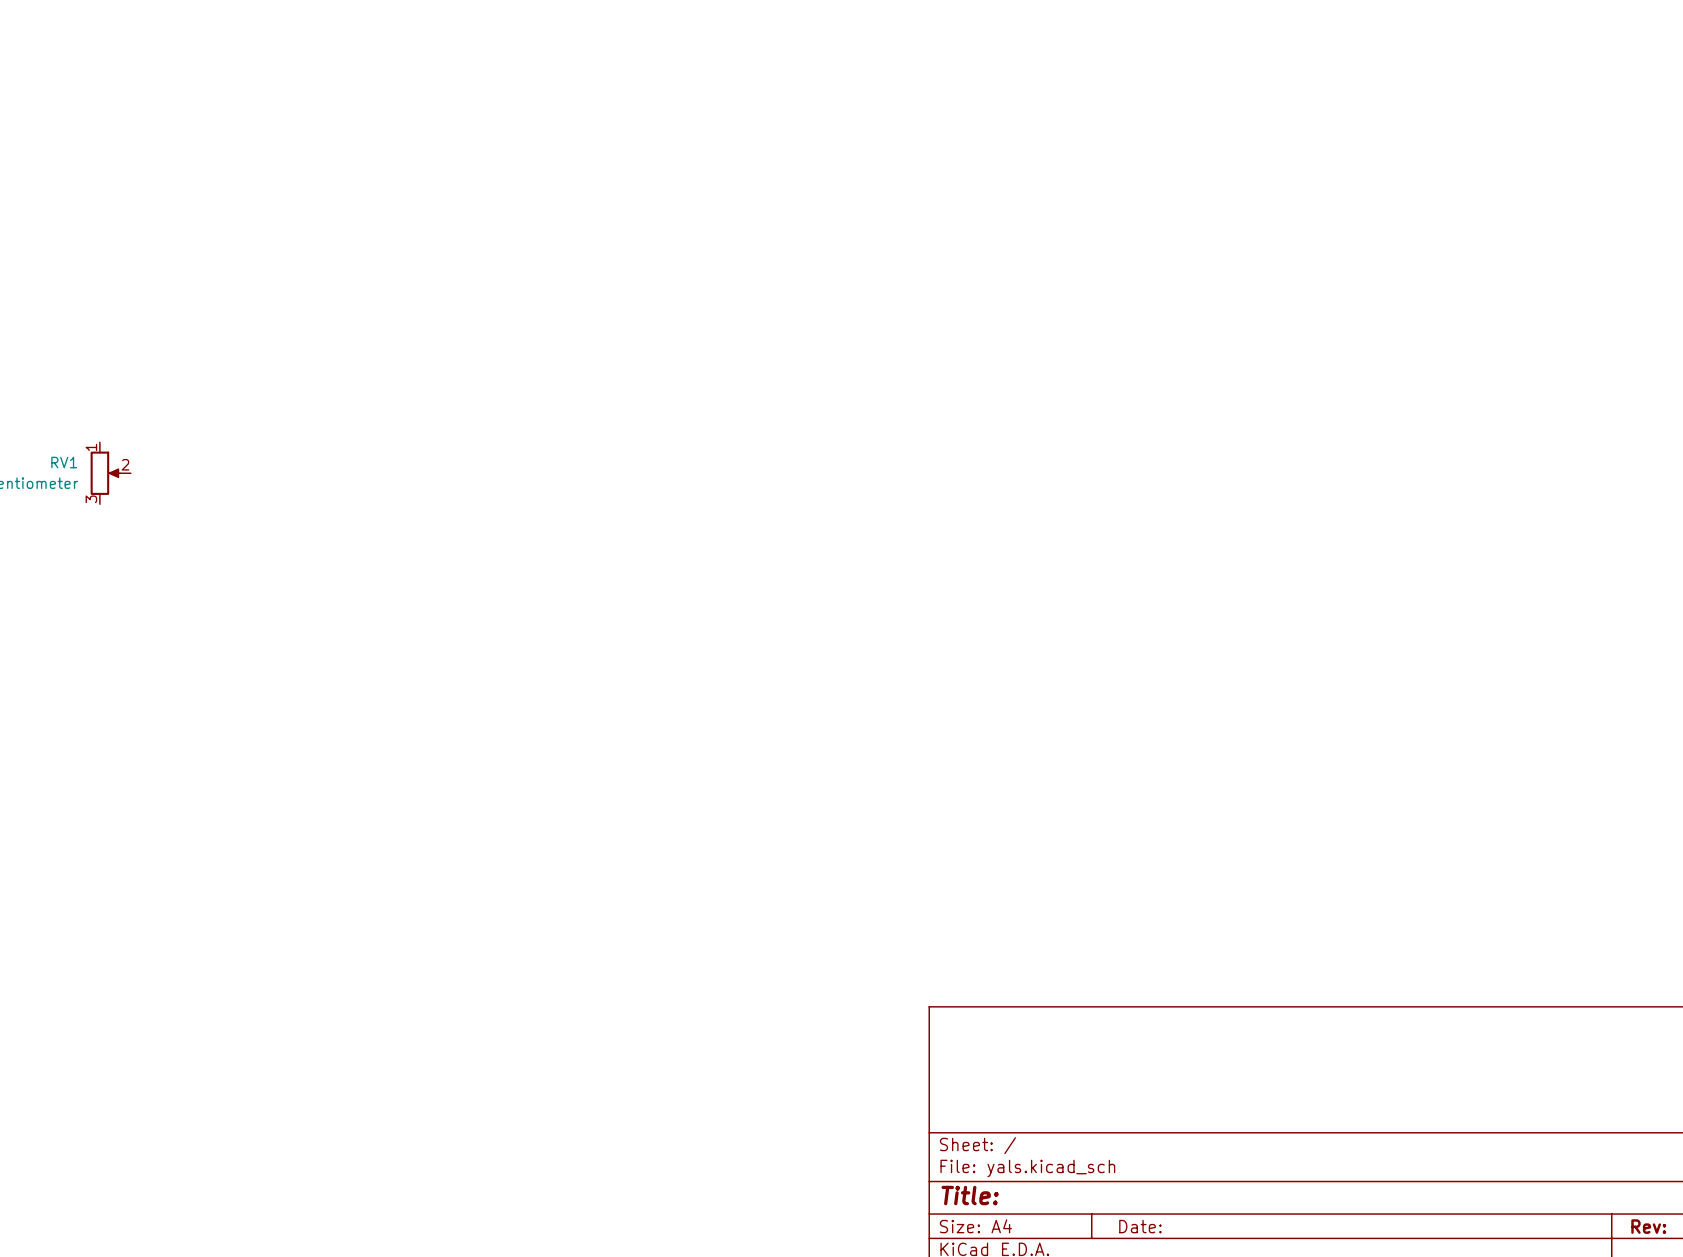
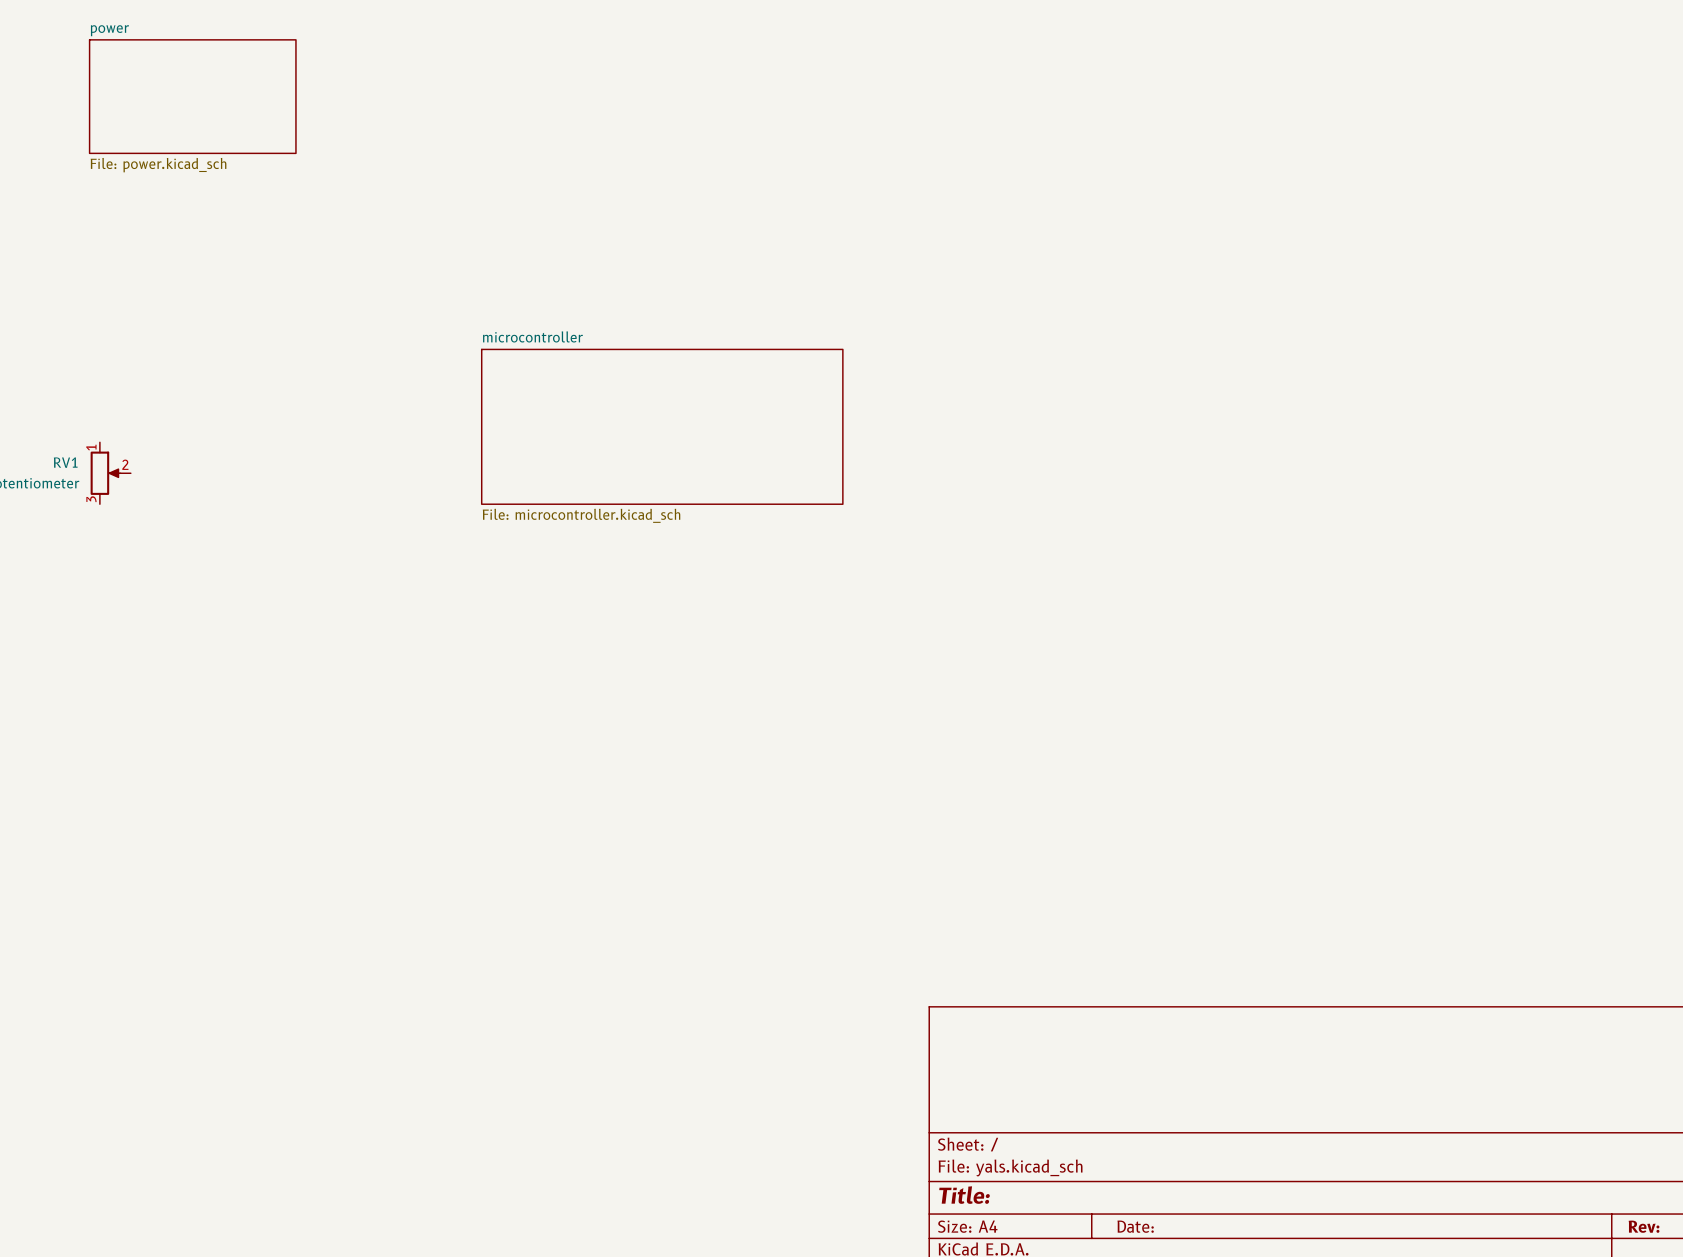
sheet power: none -> File: power.kicad_sch (192, 96)
sheet microcontroller: none -> File: microcontroller.kicad_sch (662, 426)

